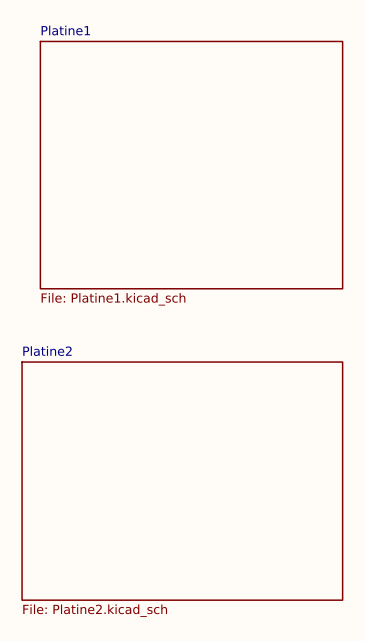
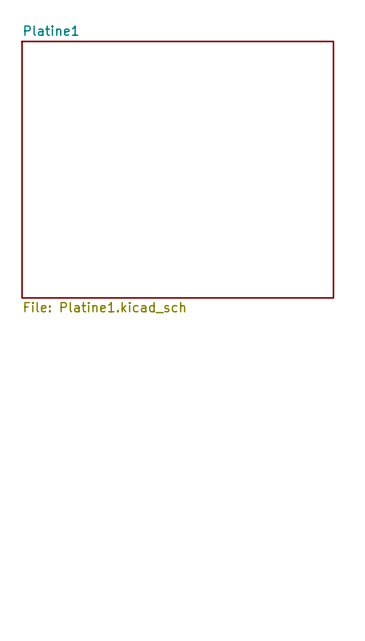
sheet Platine1 shape: [39, 40, 344, 290] -> [21, 40, 335, 299]
sheet Platine2: File: Platine2.kicad_sch (182, 481) -> none

